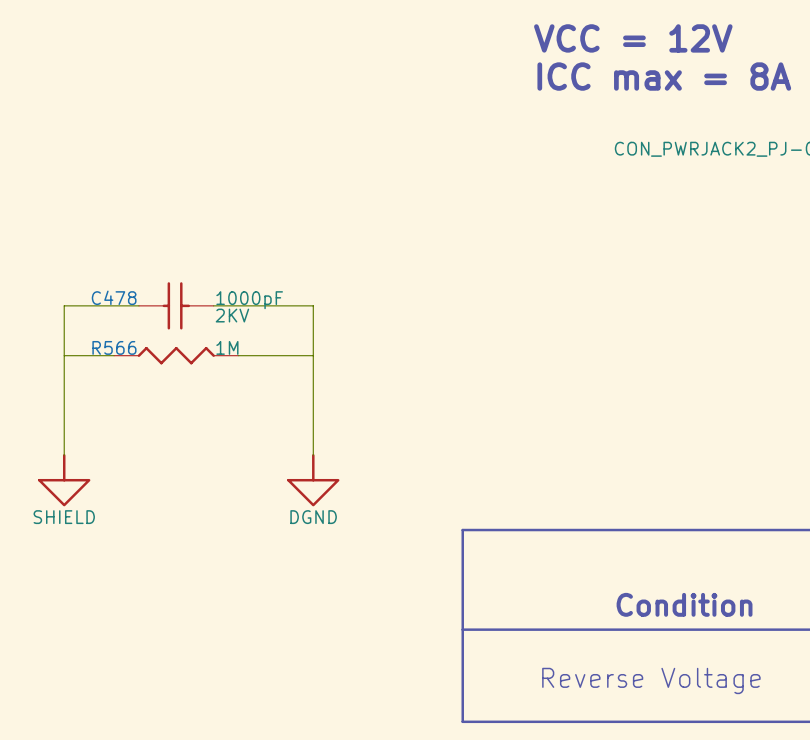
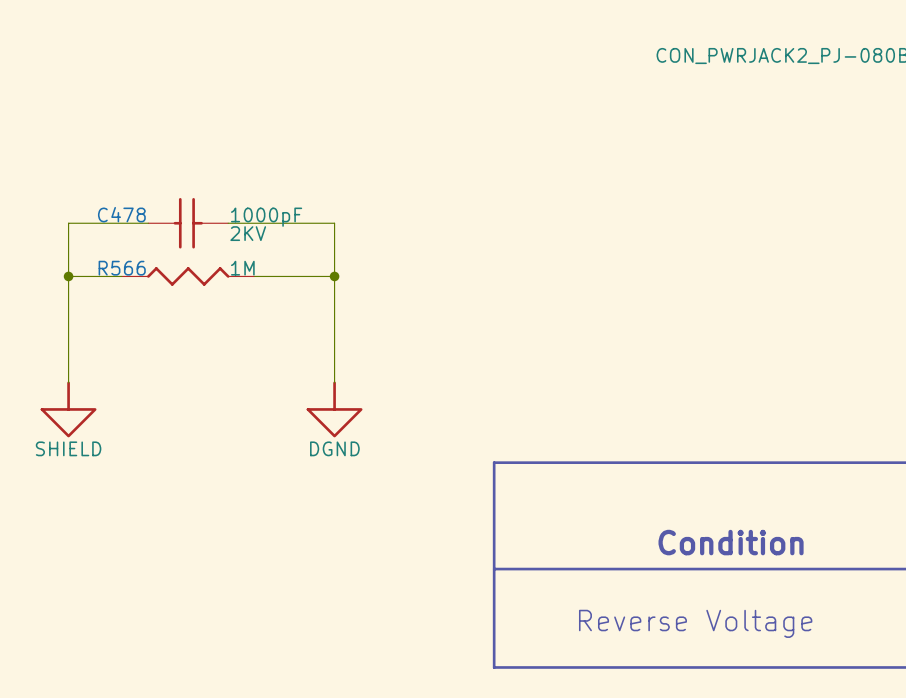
junction: none -> (68, 276)
junction: none -> (334, 276)

